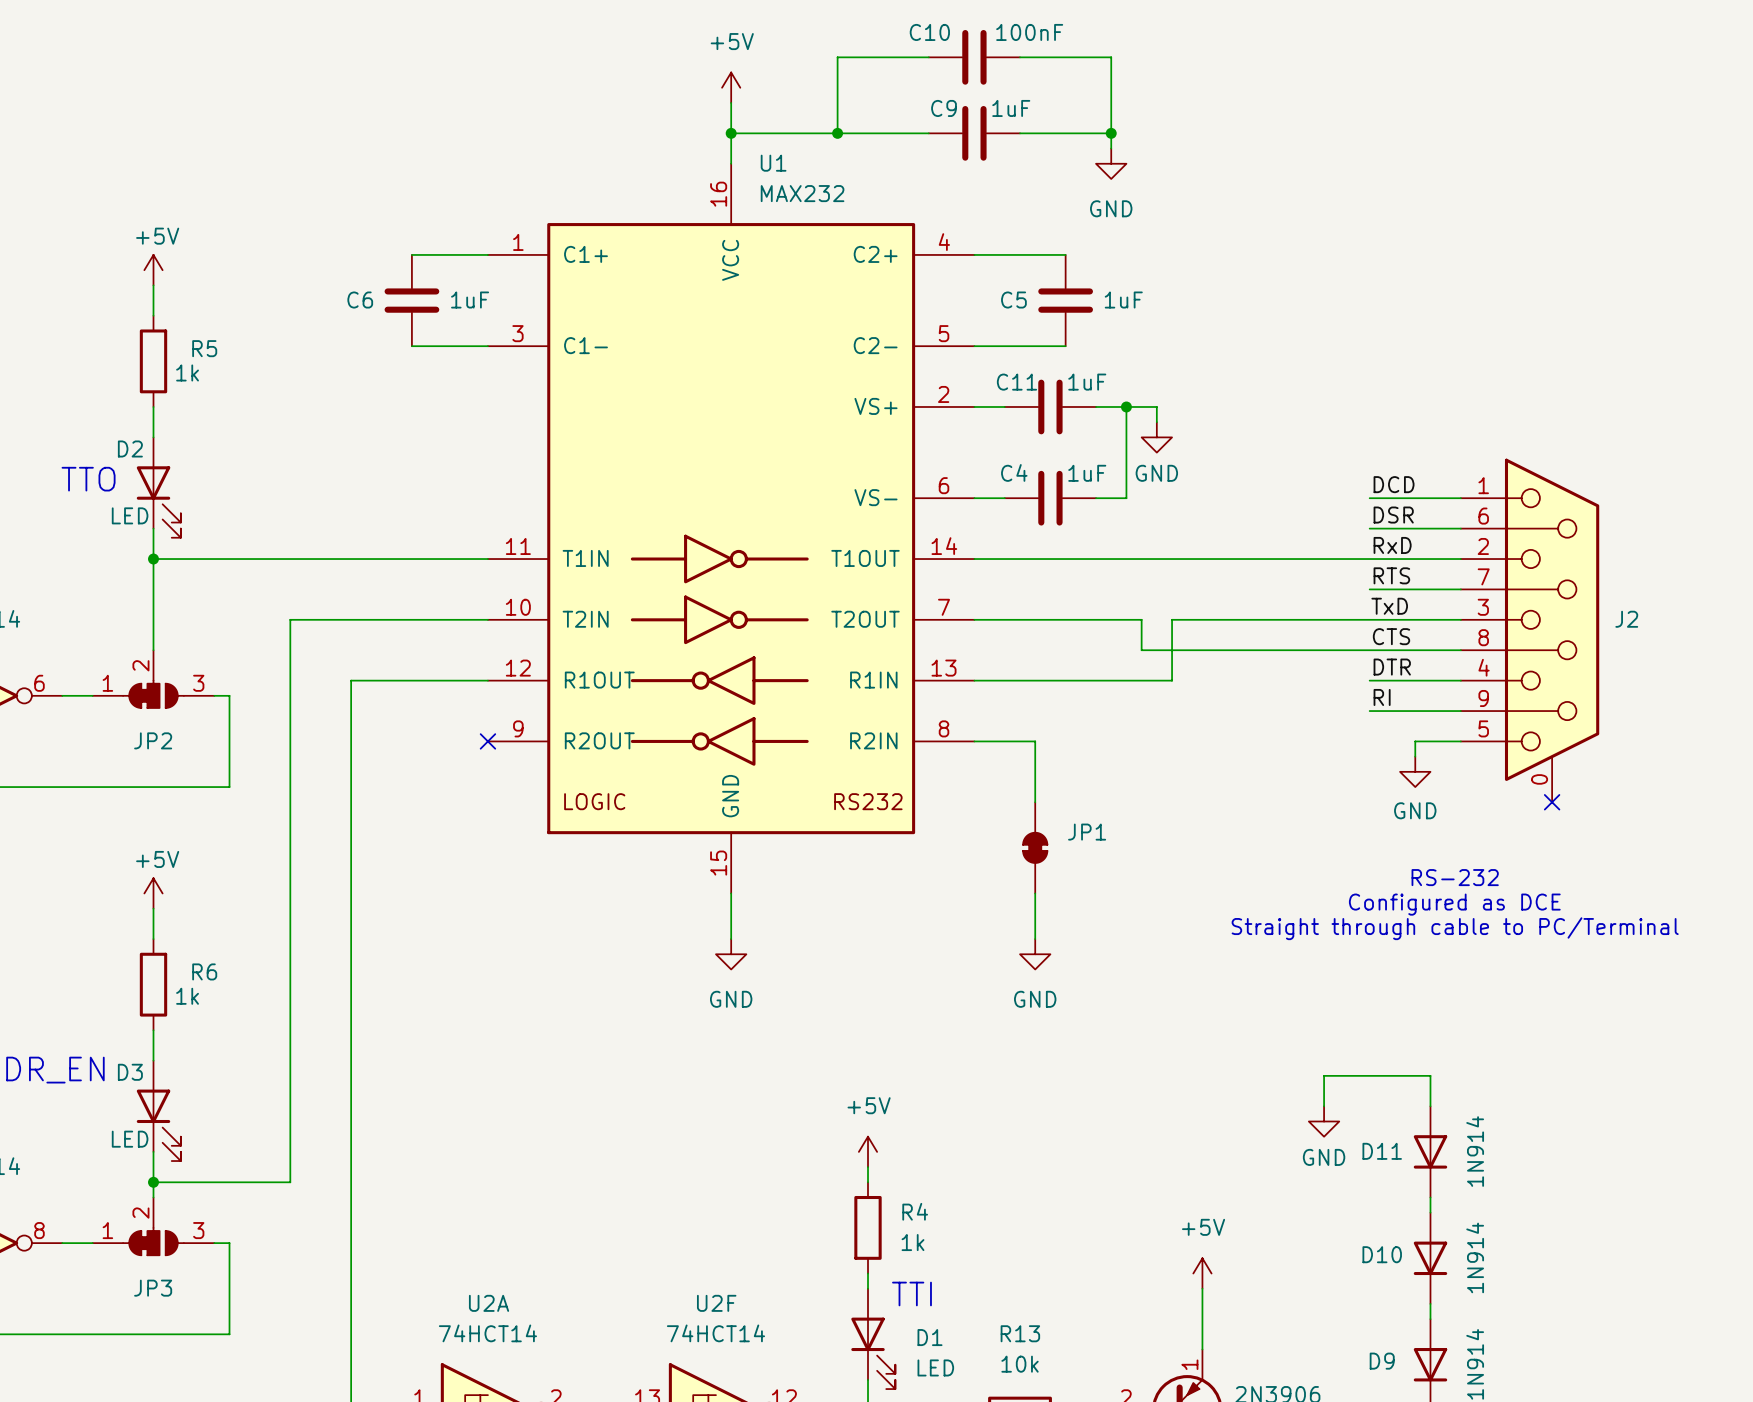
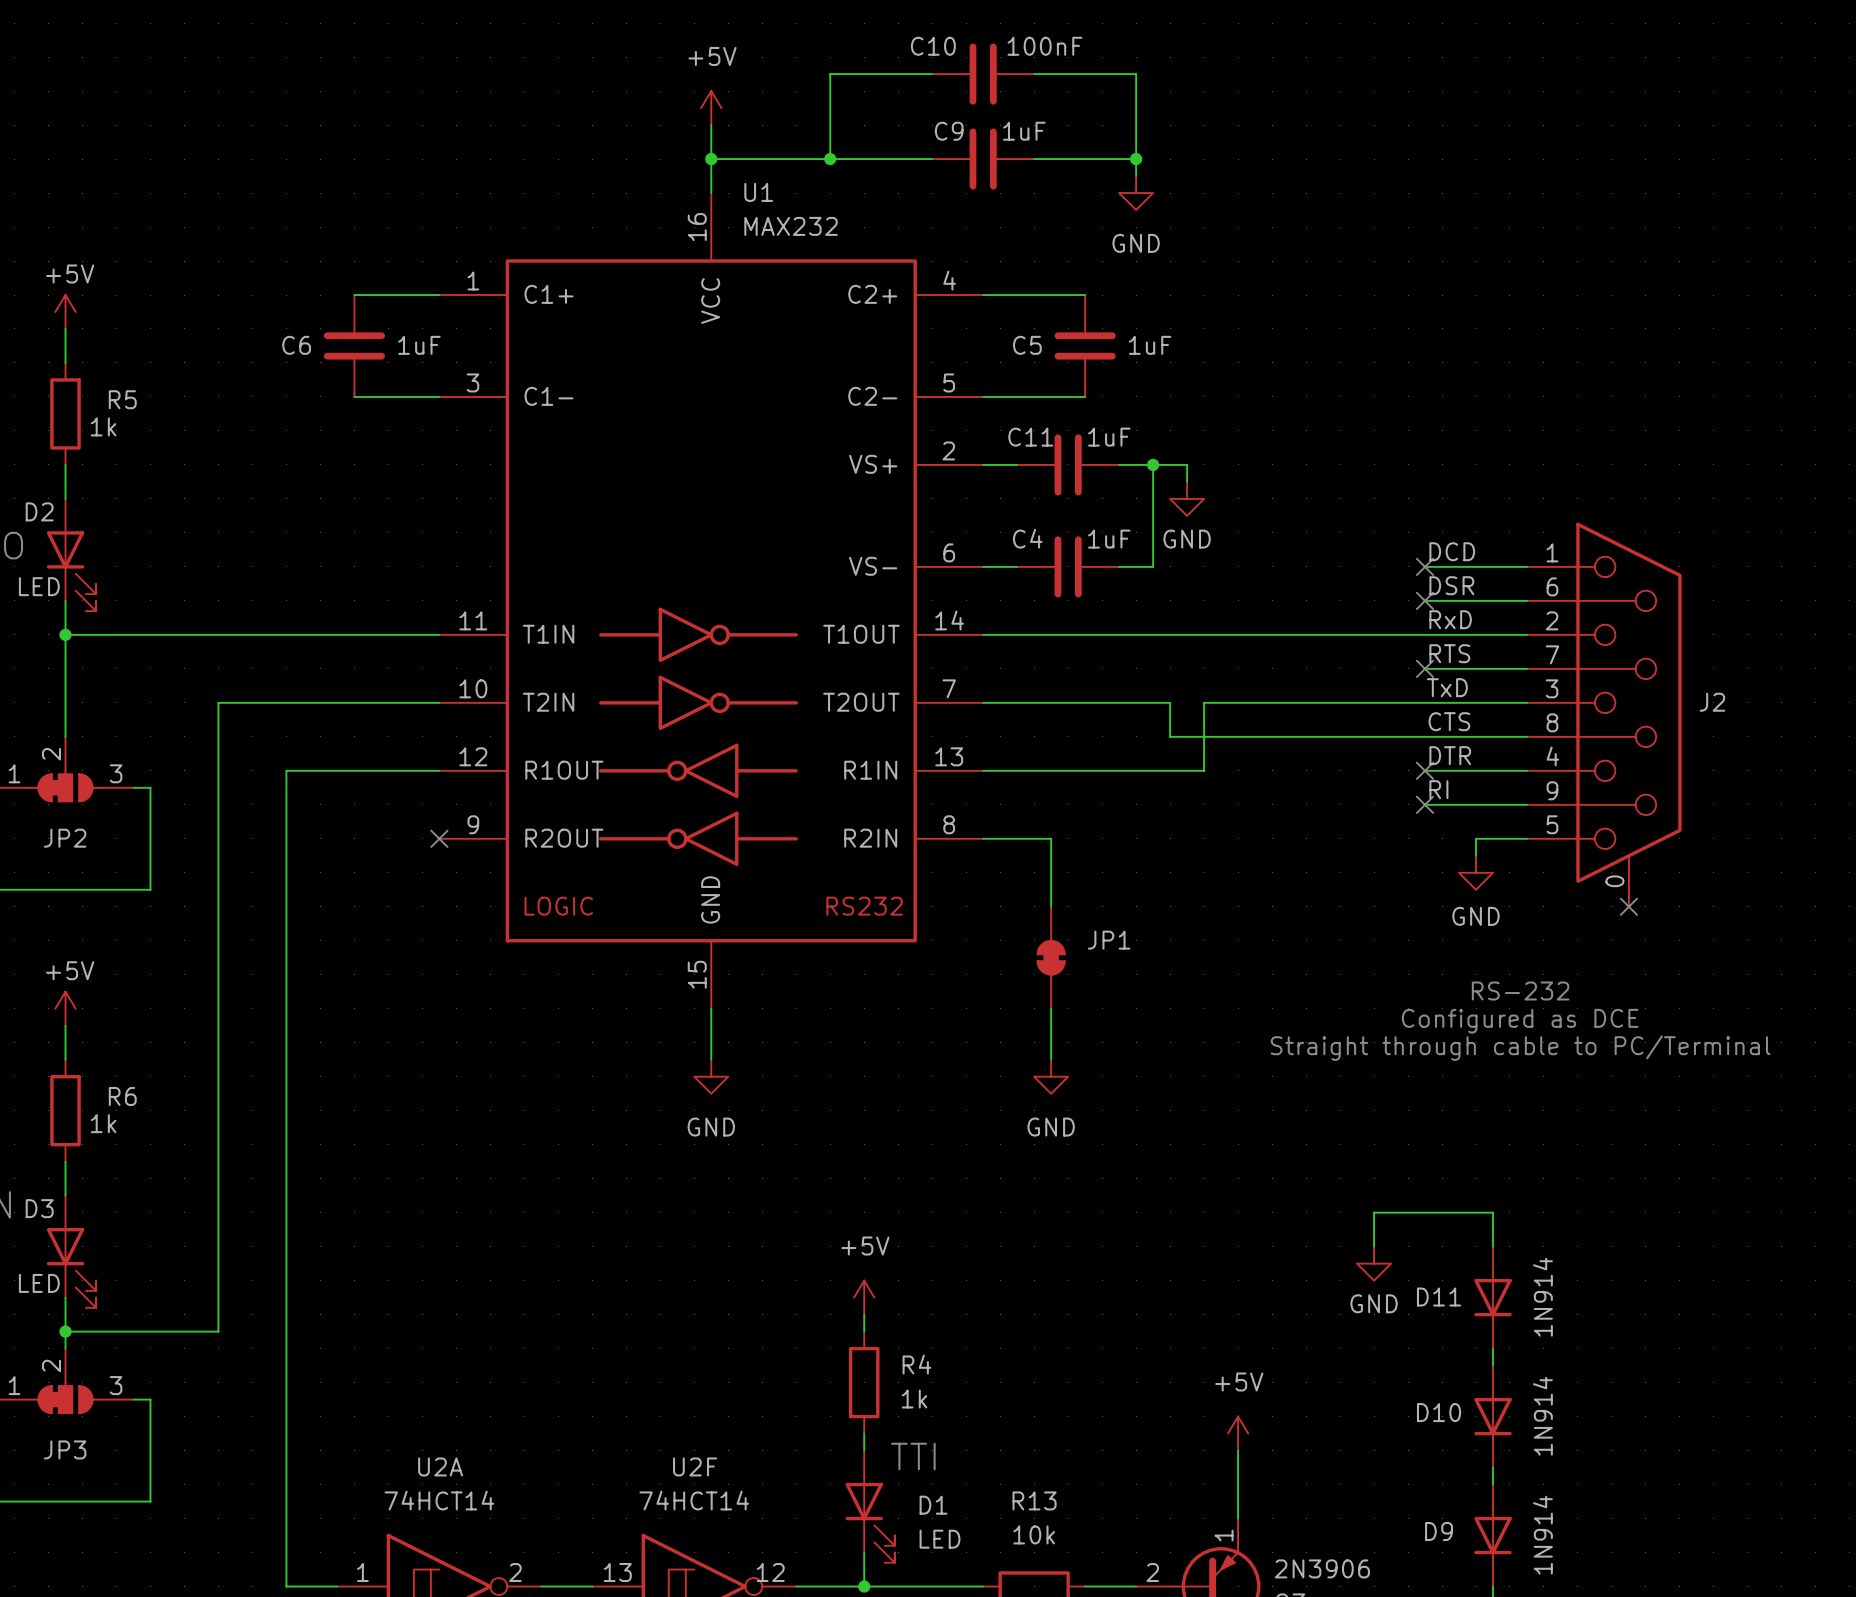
no-connect mark: none -> (1425, 566)
no-connect mark: none -> (1425, 600)
no-connect mark: none -> (1425, 668)
no-connect mark: none -> (1425, 770)
no-connect mark: none -> (1425, 804)

